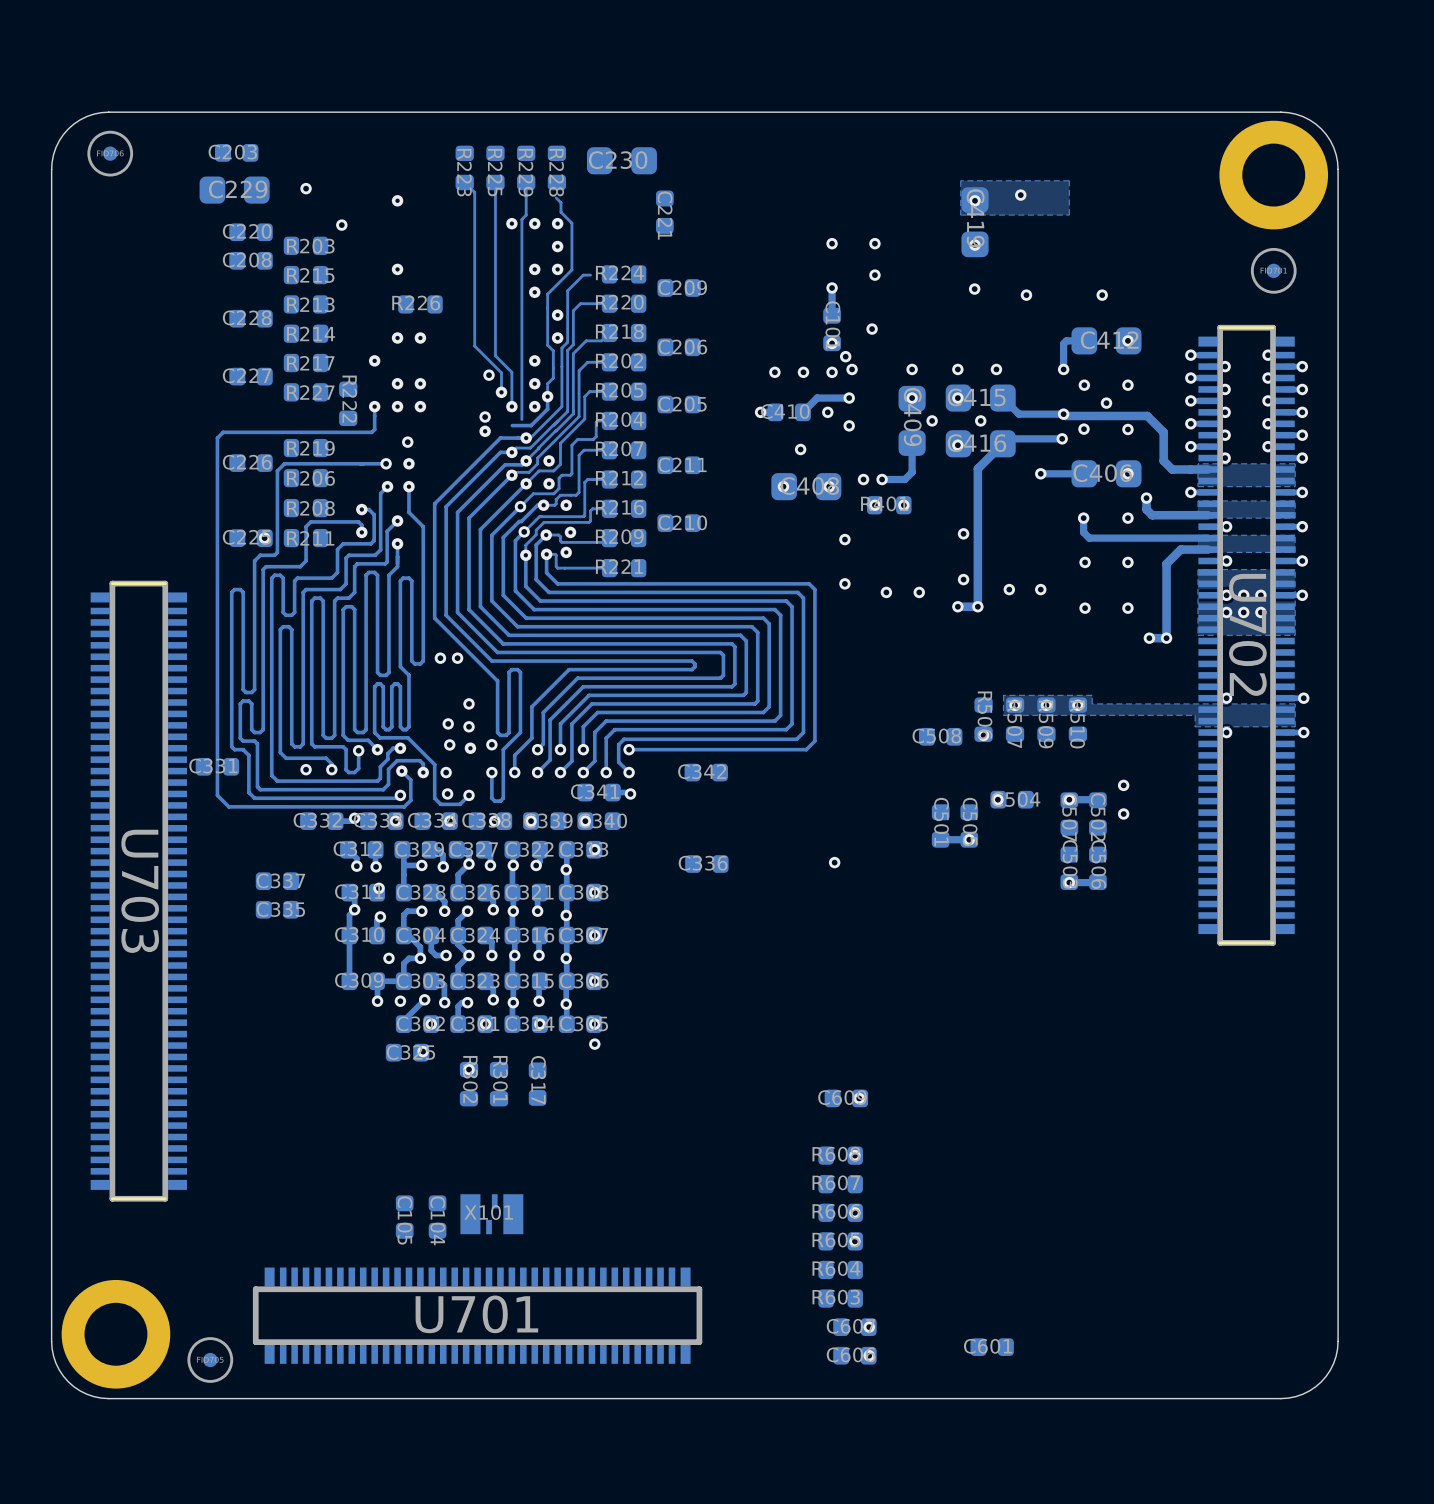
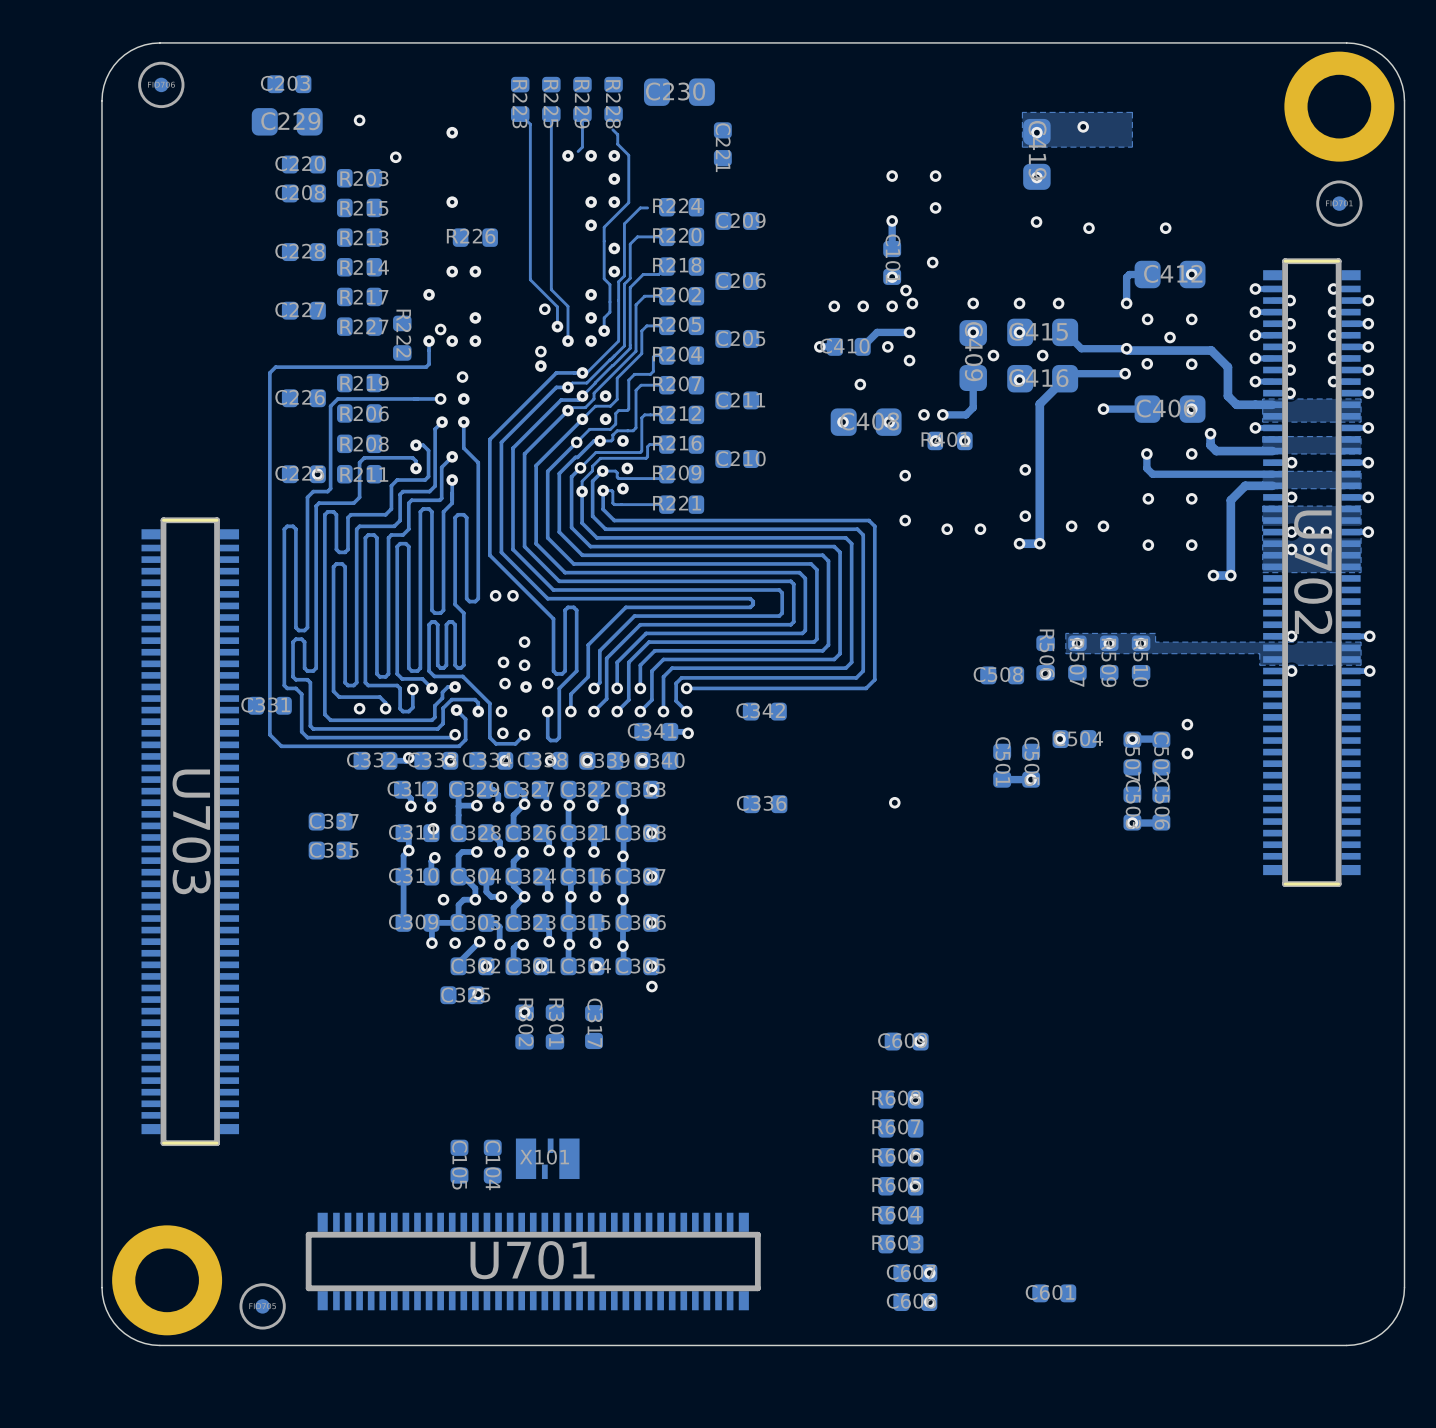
track: (521, 219) (521, 419) -> none
via: (397, 383) -> none
via: none -> (440, 329)
track: (547, 396) (547, 409) (531, 425) (512, 425) -> none

